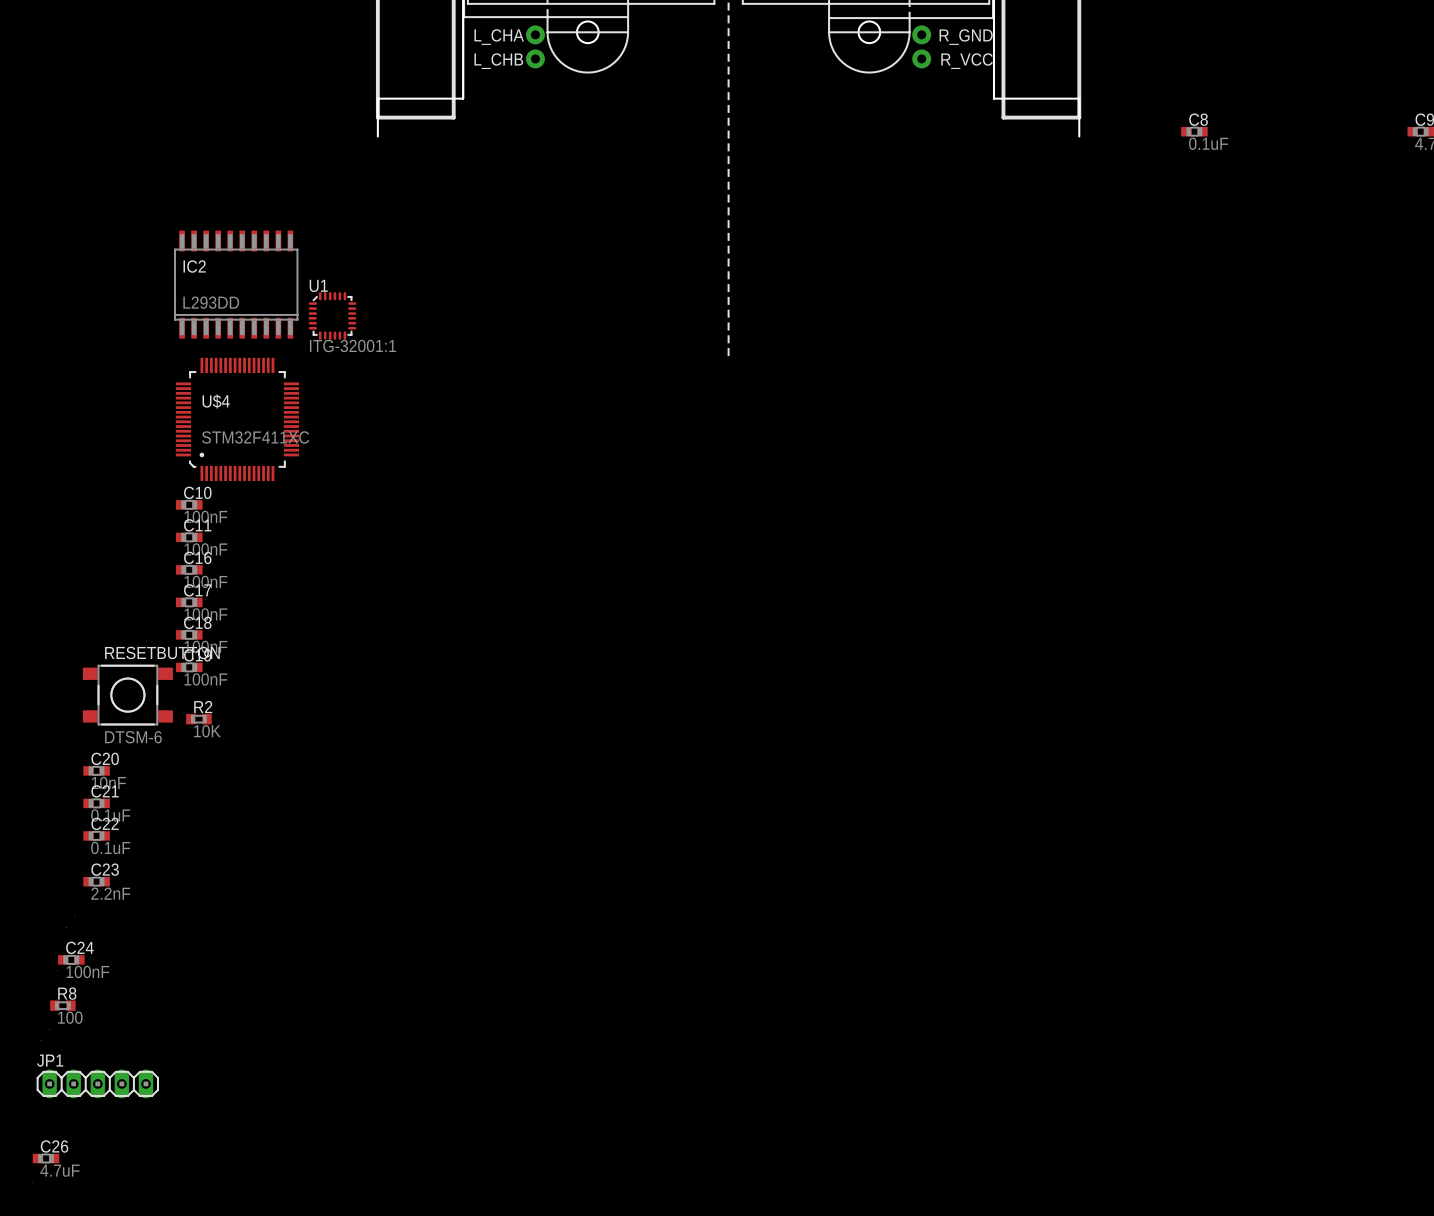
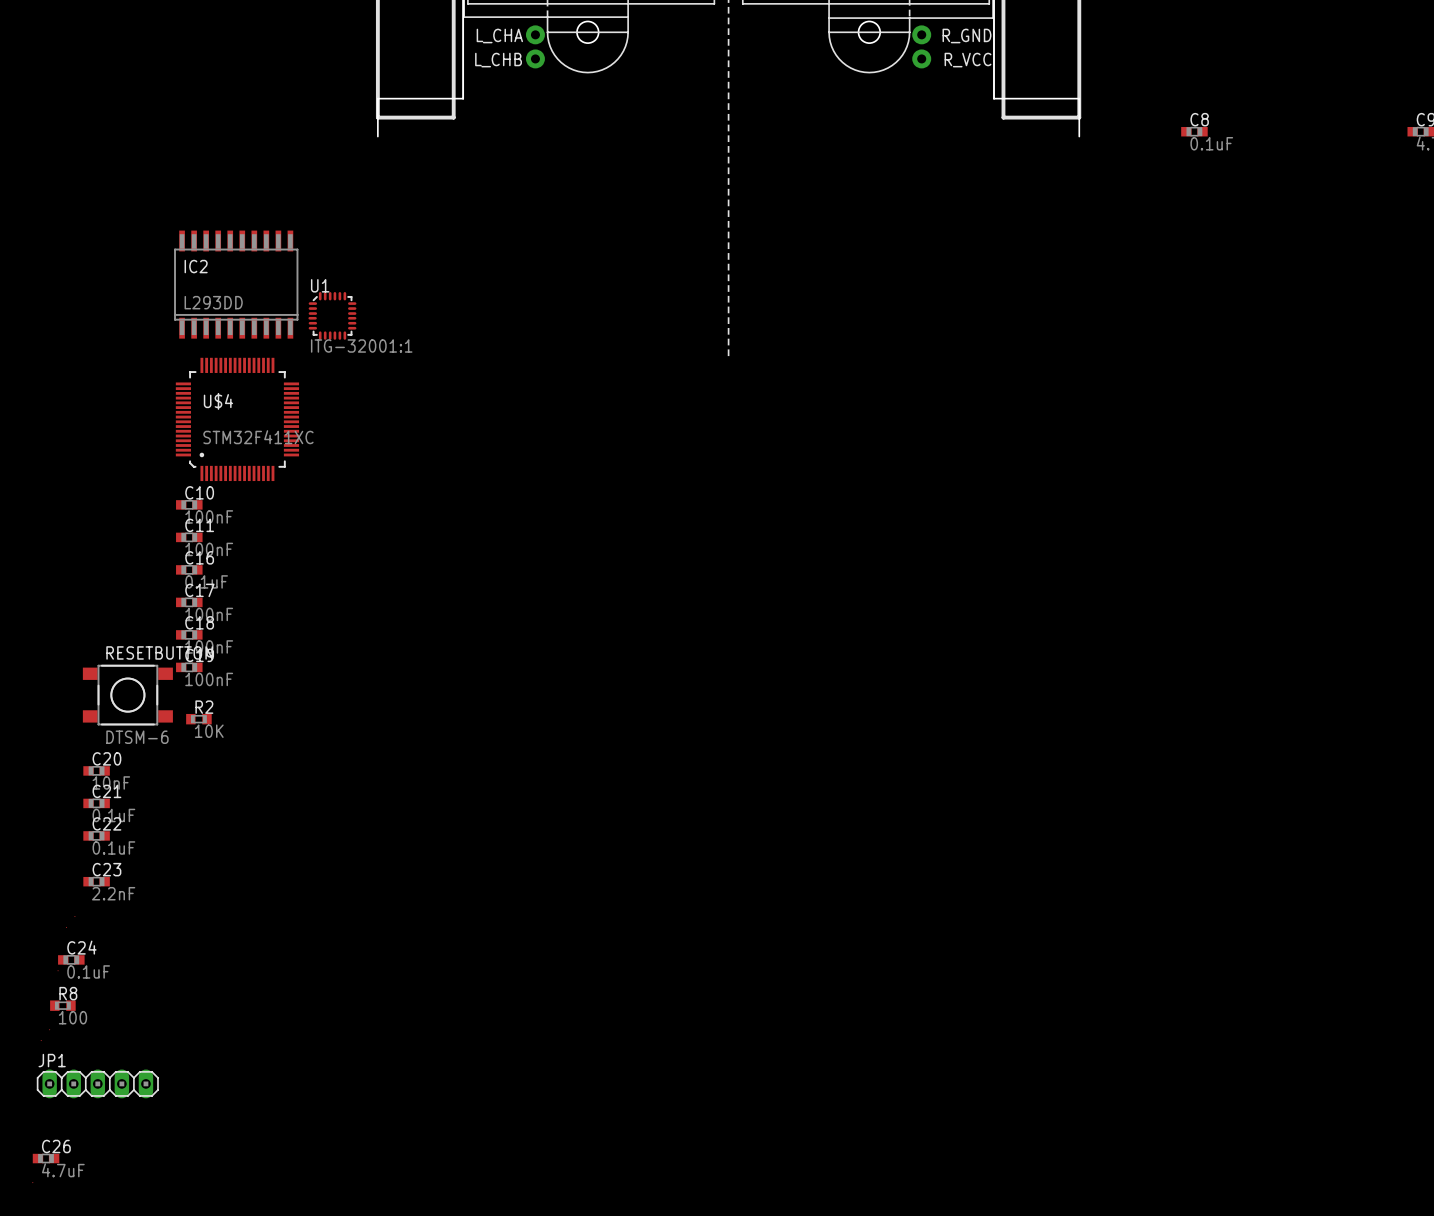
C16 value: 100nF (205, 581) -> 0.1uF (206, 581)
C24 value: 100nF (87, 971) -> 0.1uF (88, 971)

